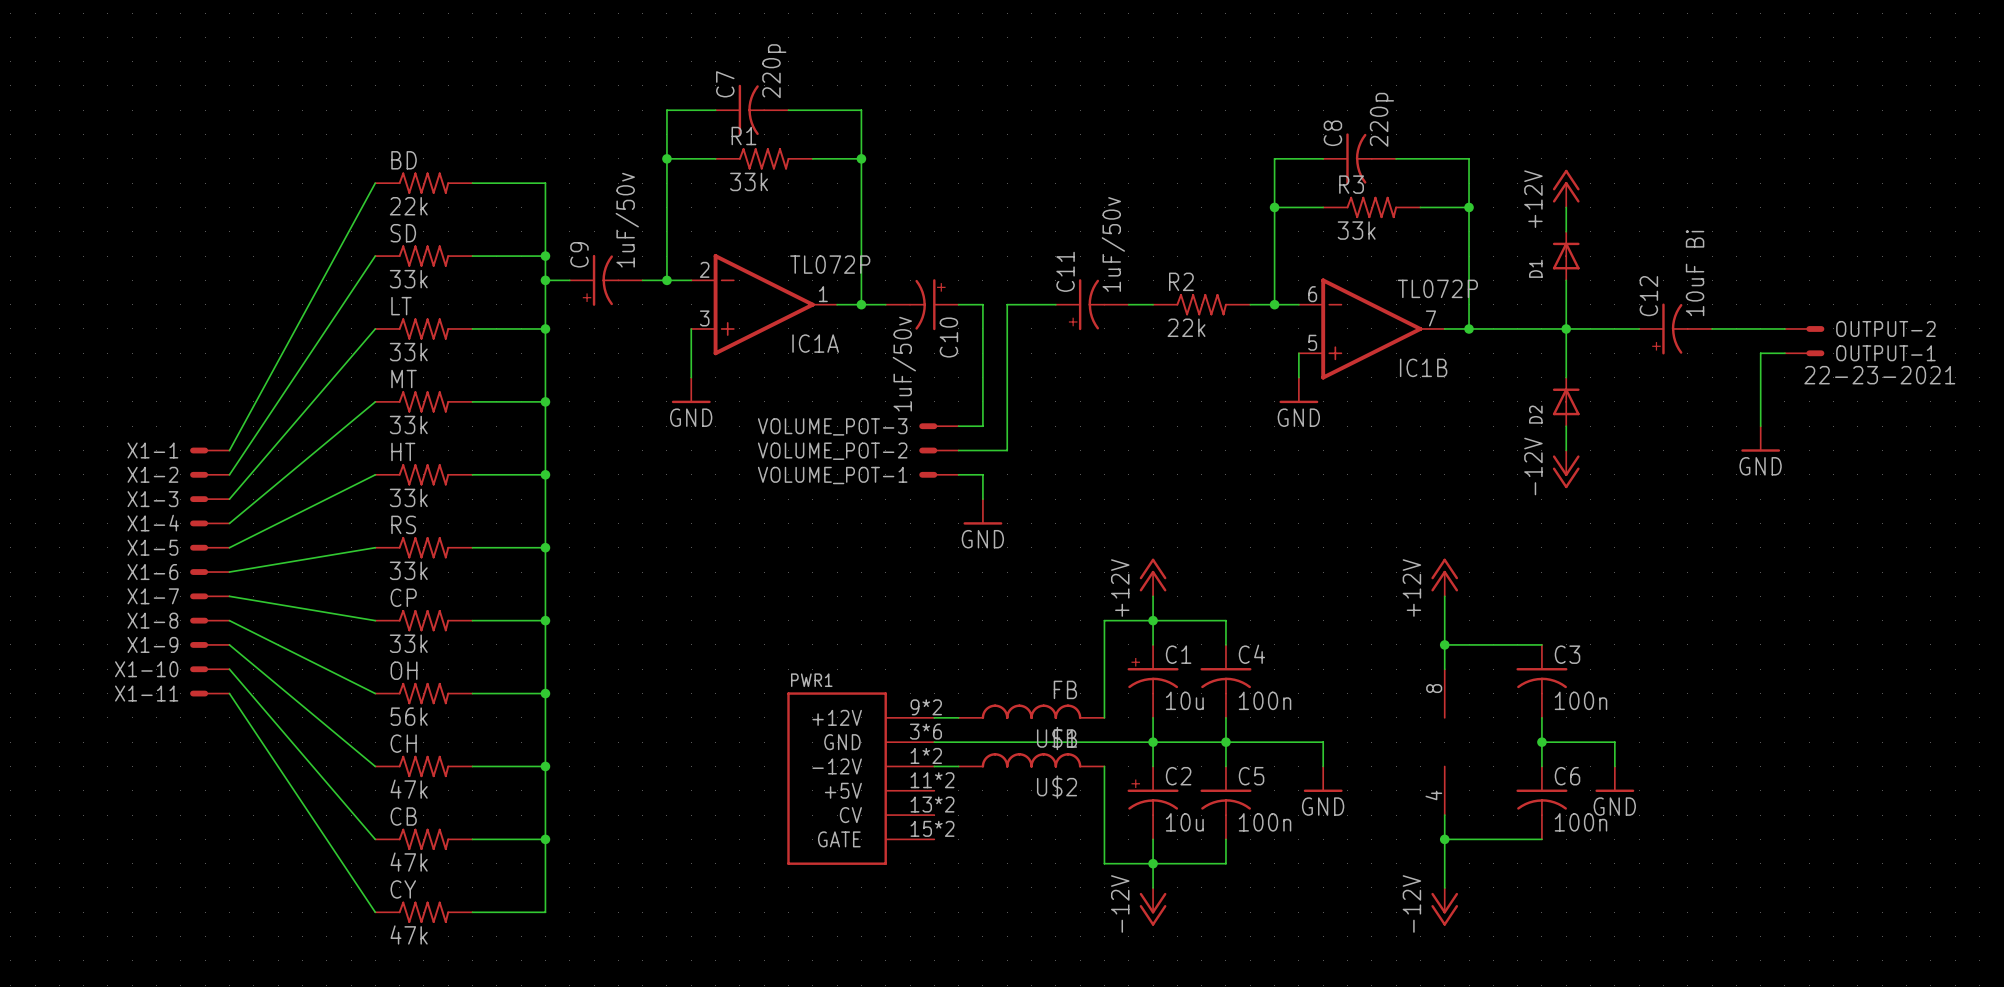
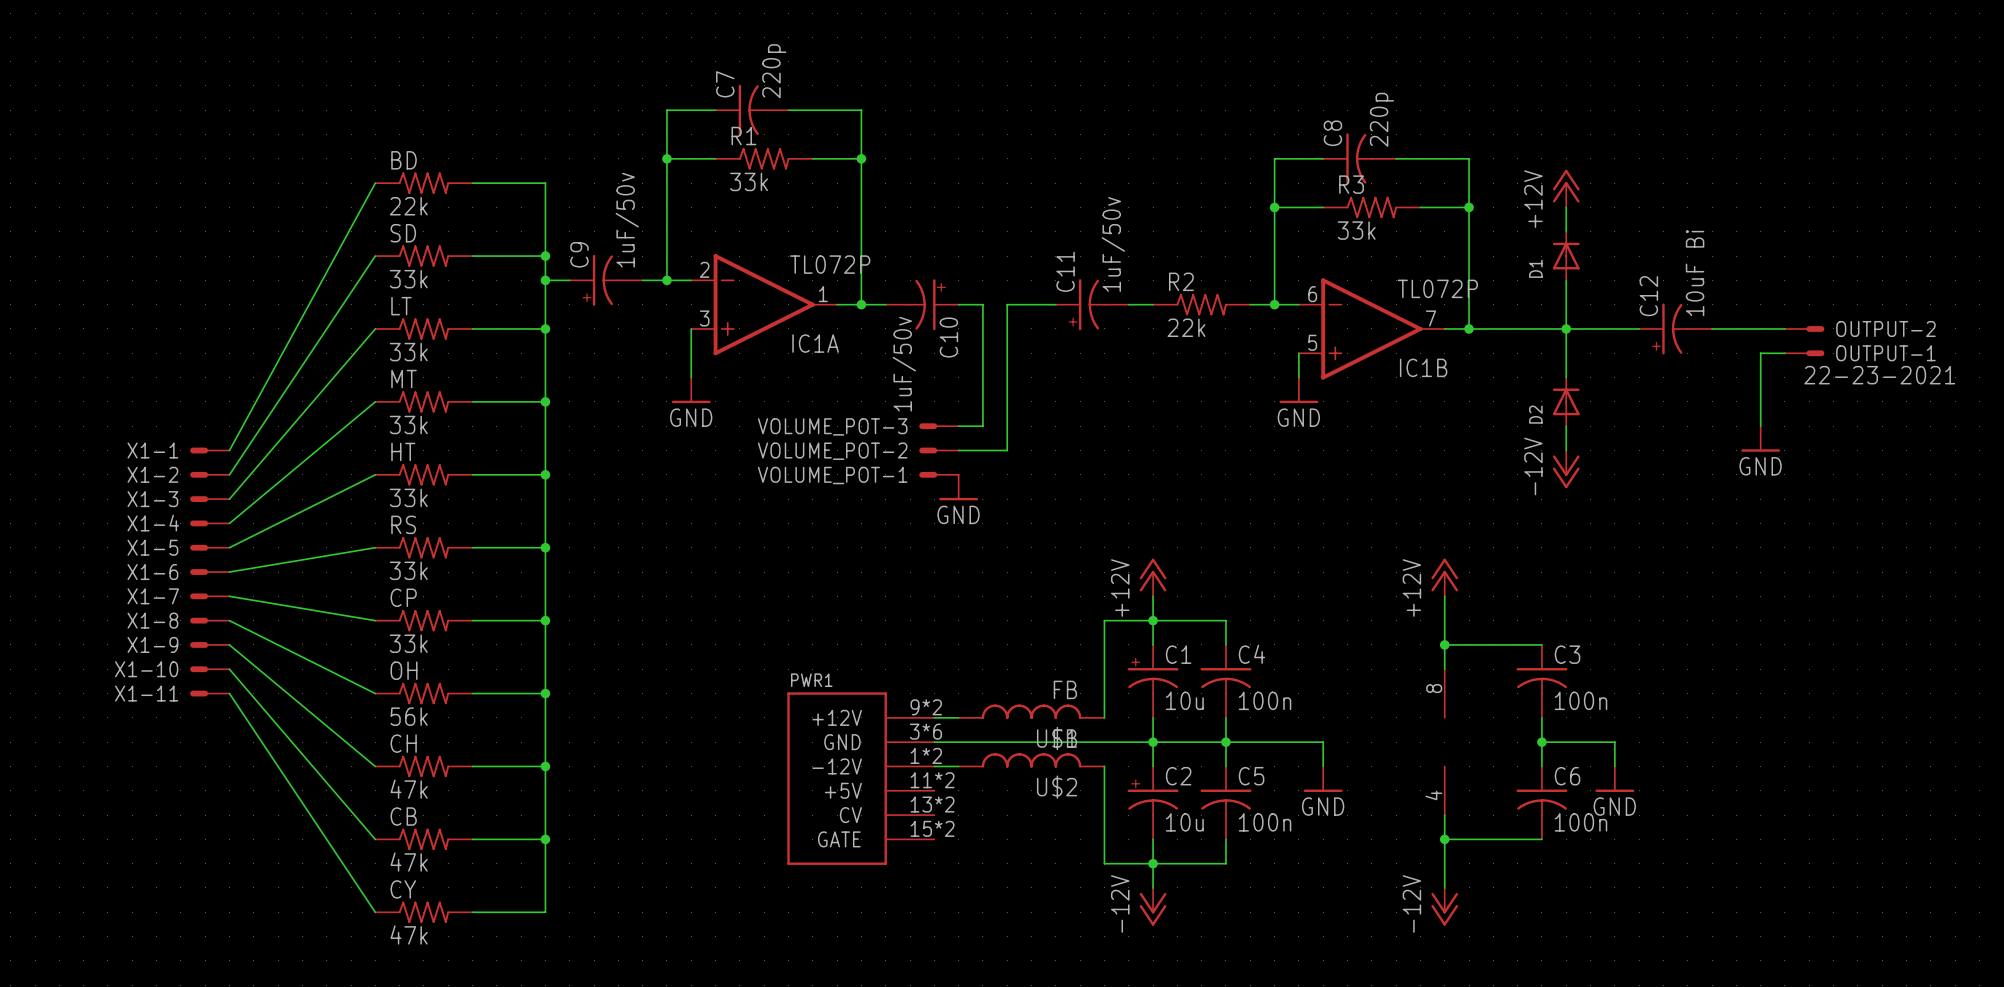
wire: (958, 474) (982, 474) (982, 499) -> none
power symbol position: GND (982, 511) -> GND (958, 487)

